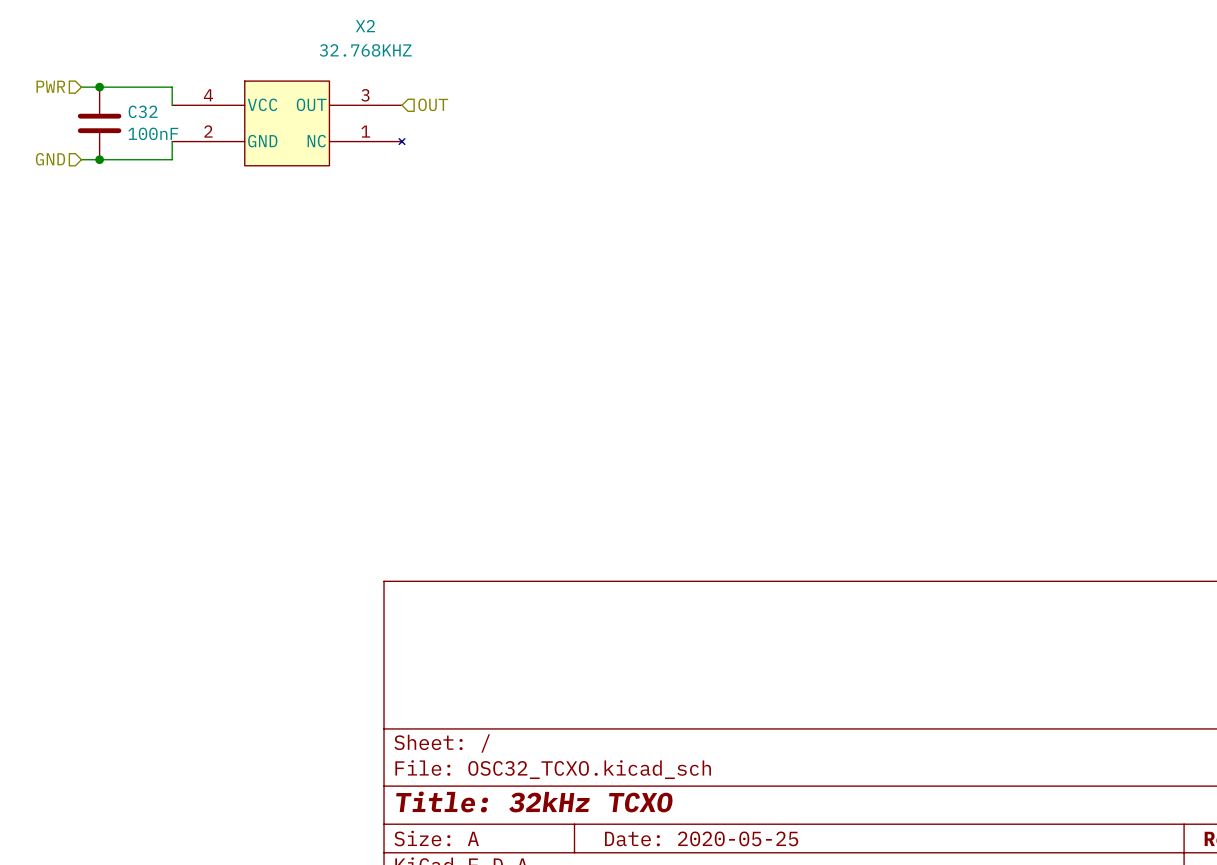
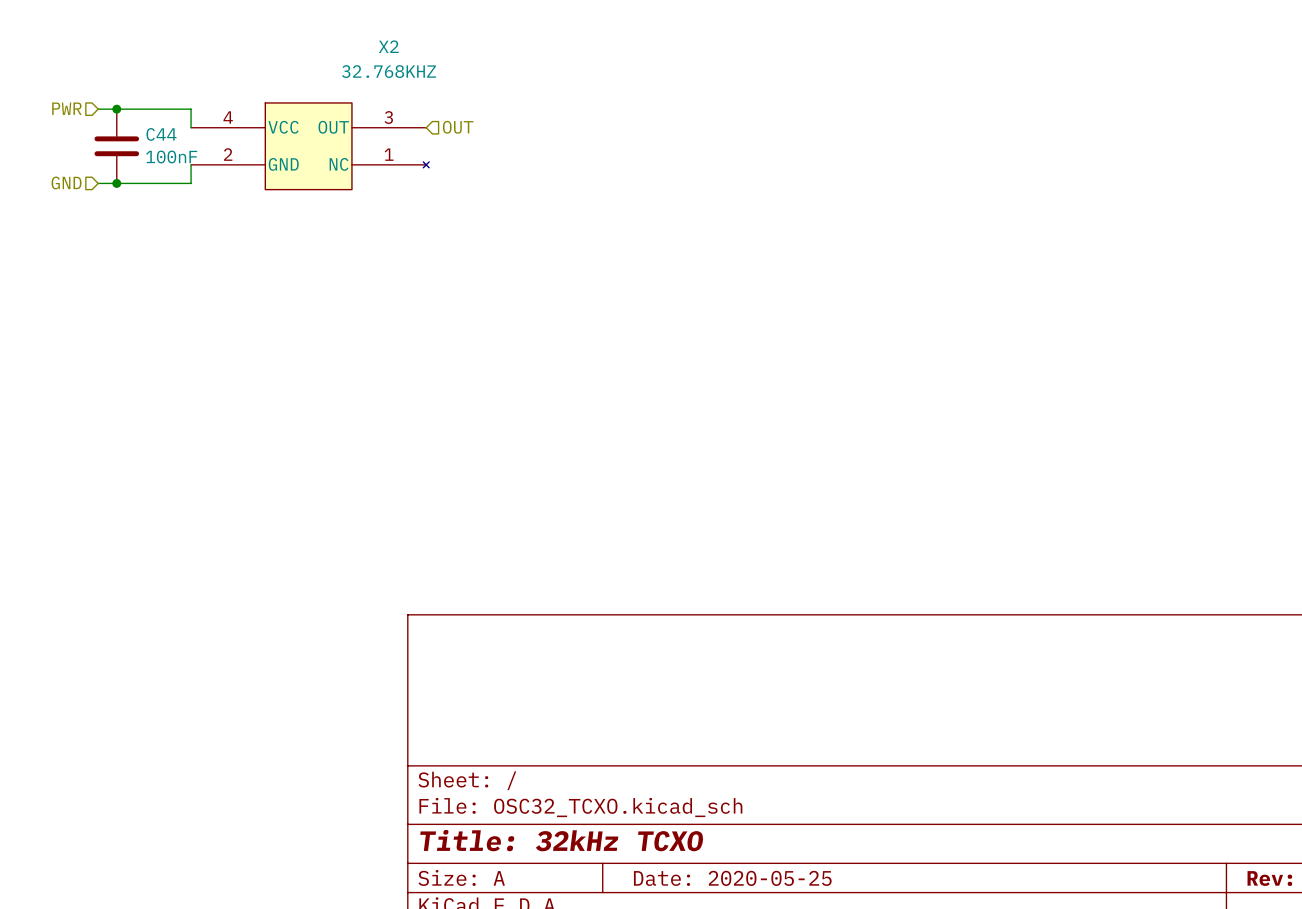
C32 name: C32 (143, 111) -> C44 (161, 134)

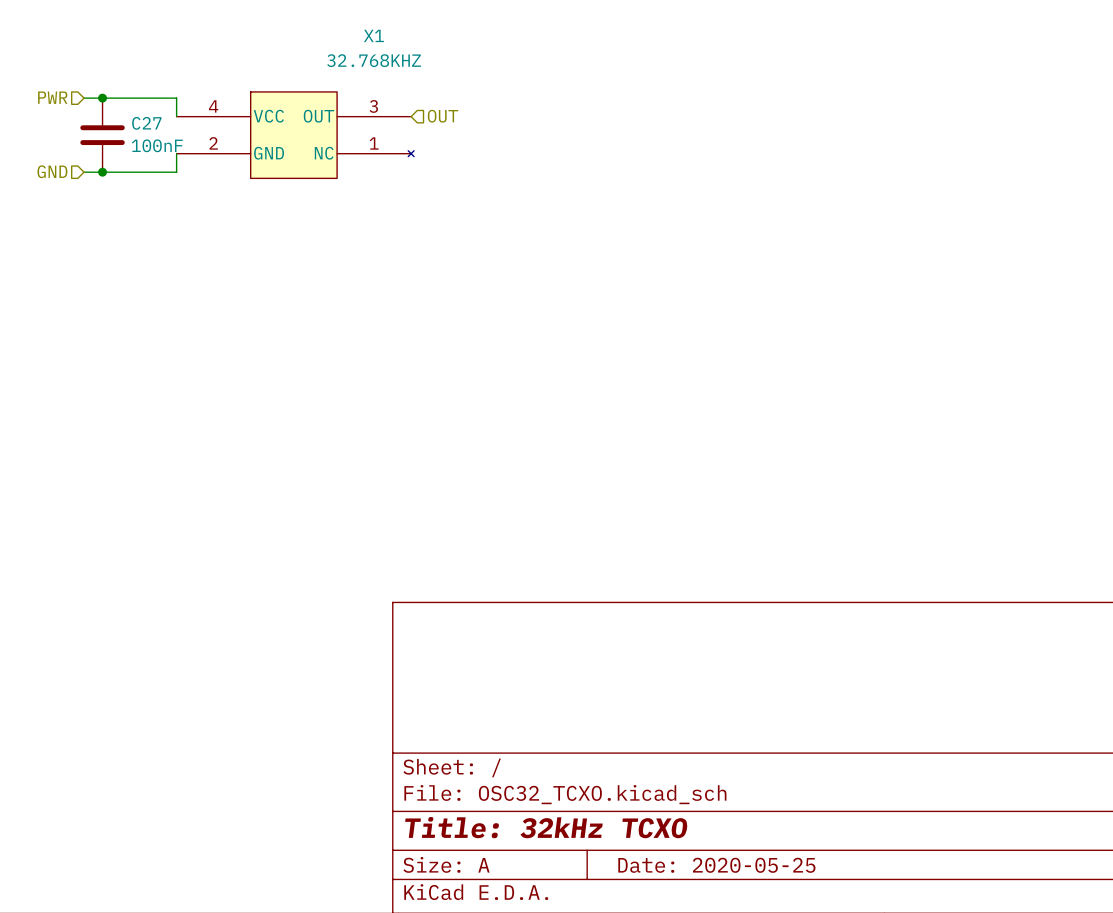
X2 name: X2 (388, 46) -> X1 (373, 35)
C44 name: C44 (161, 134) -> C27 (146, 123)

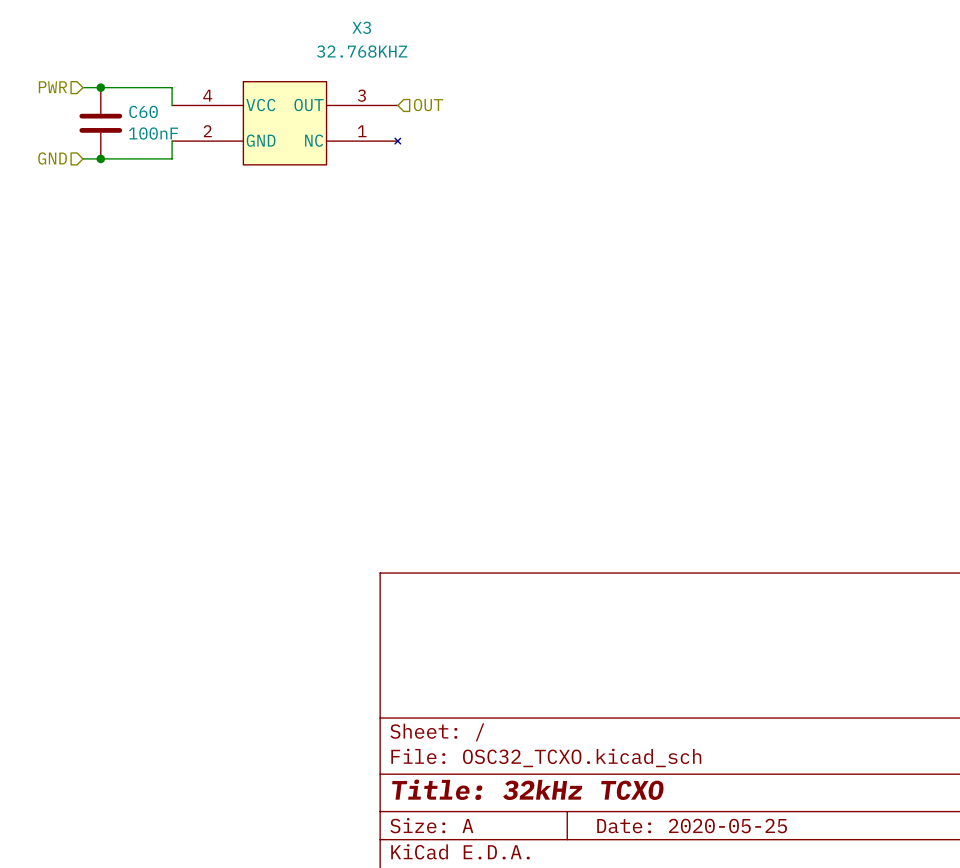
X1 name: X1 (373, 35) -> X3 (361, 27)
C27 name: C27 (146, 123) -> C60 (143, 111)

